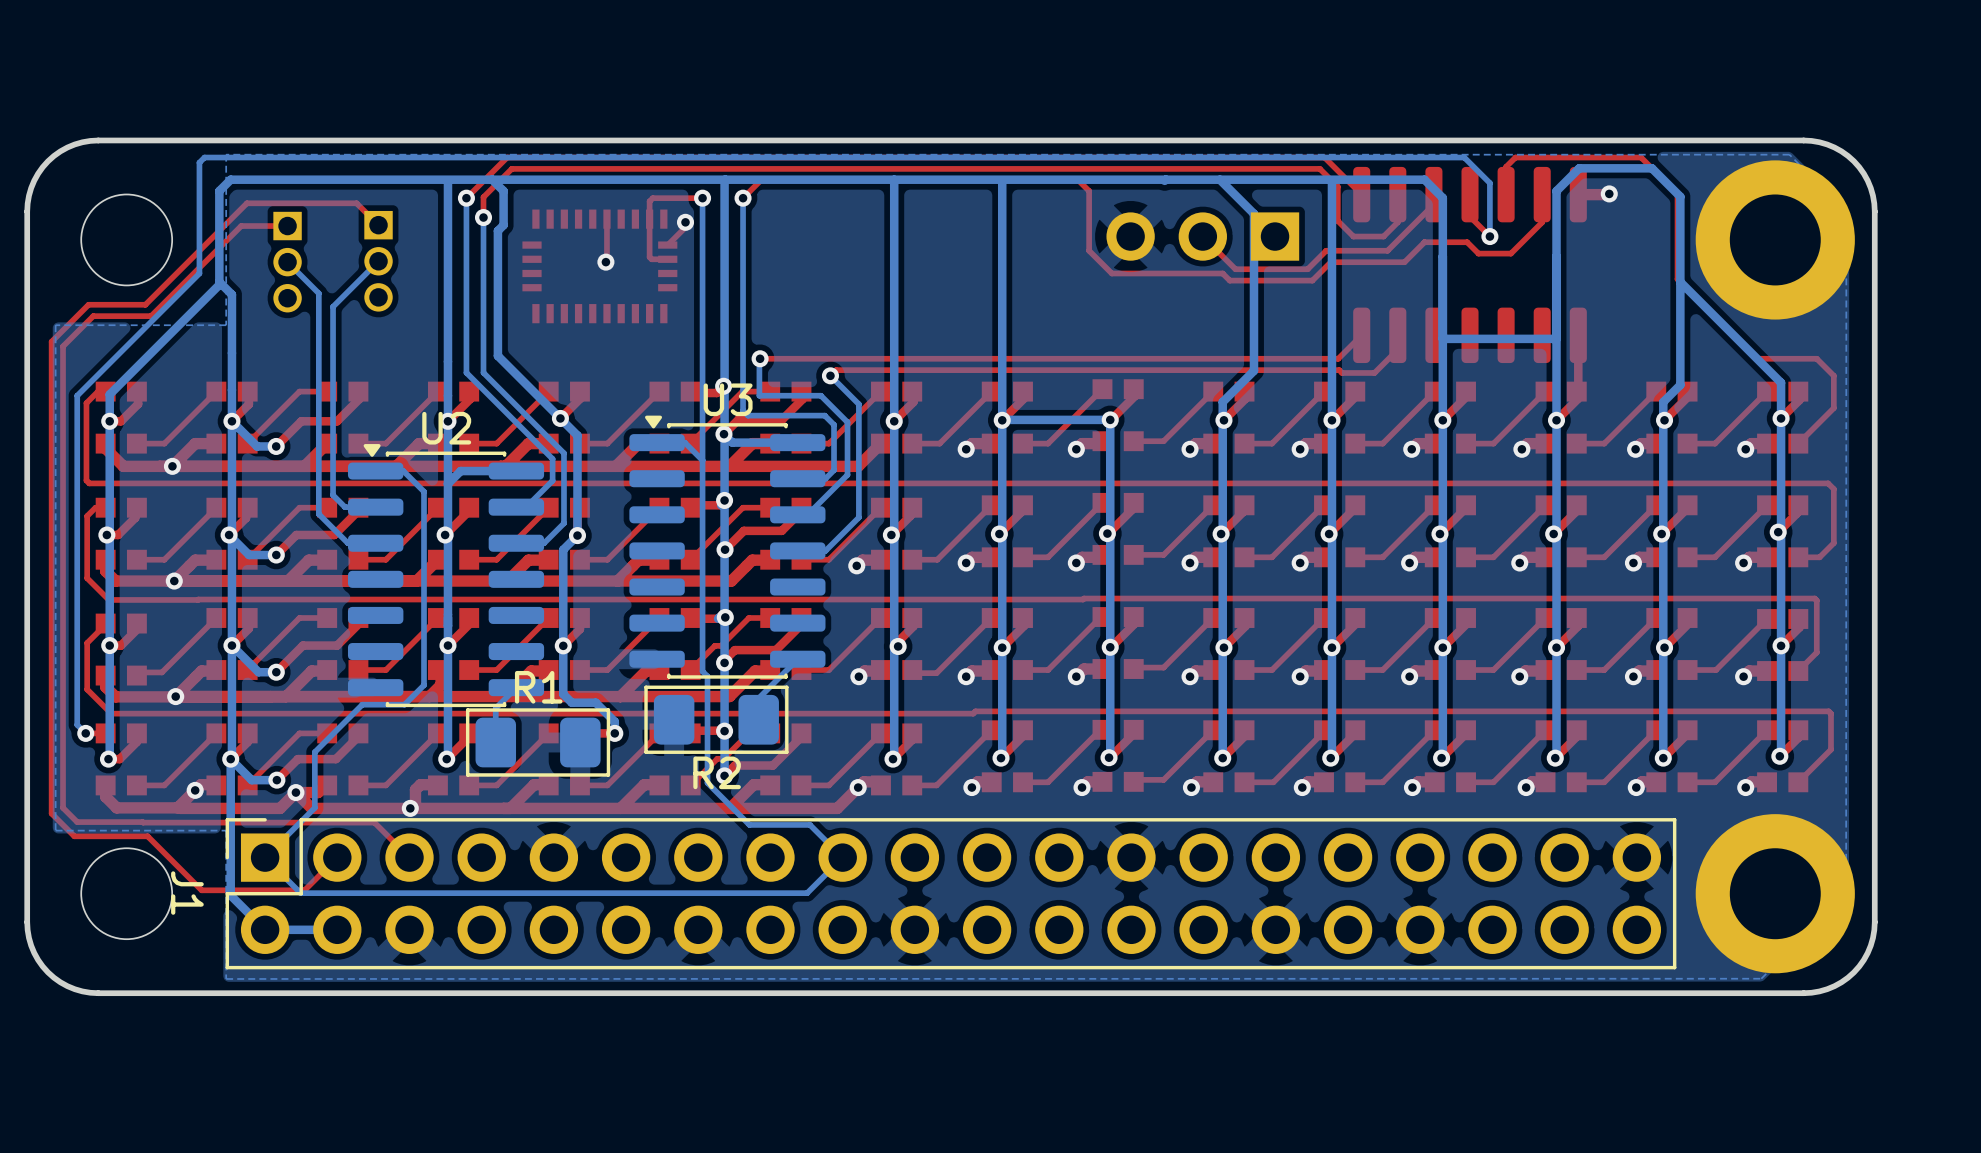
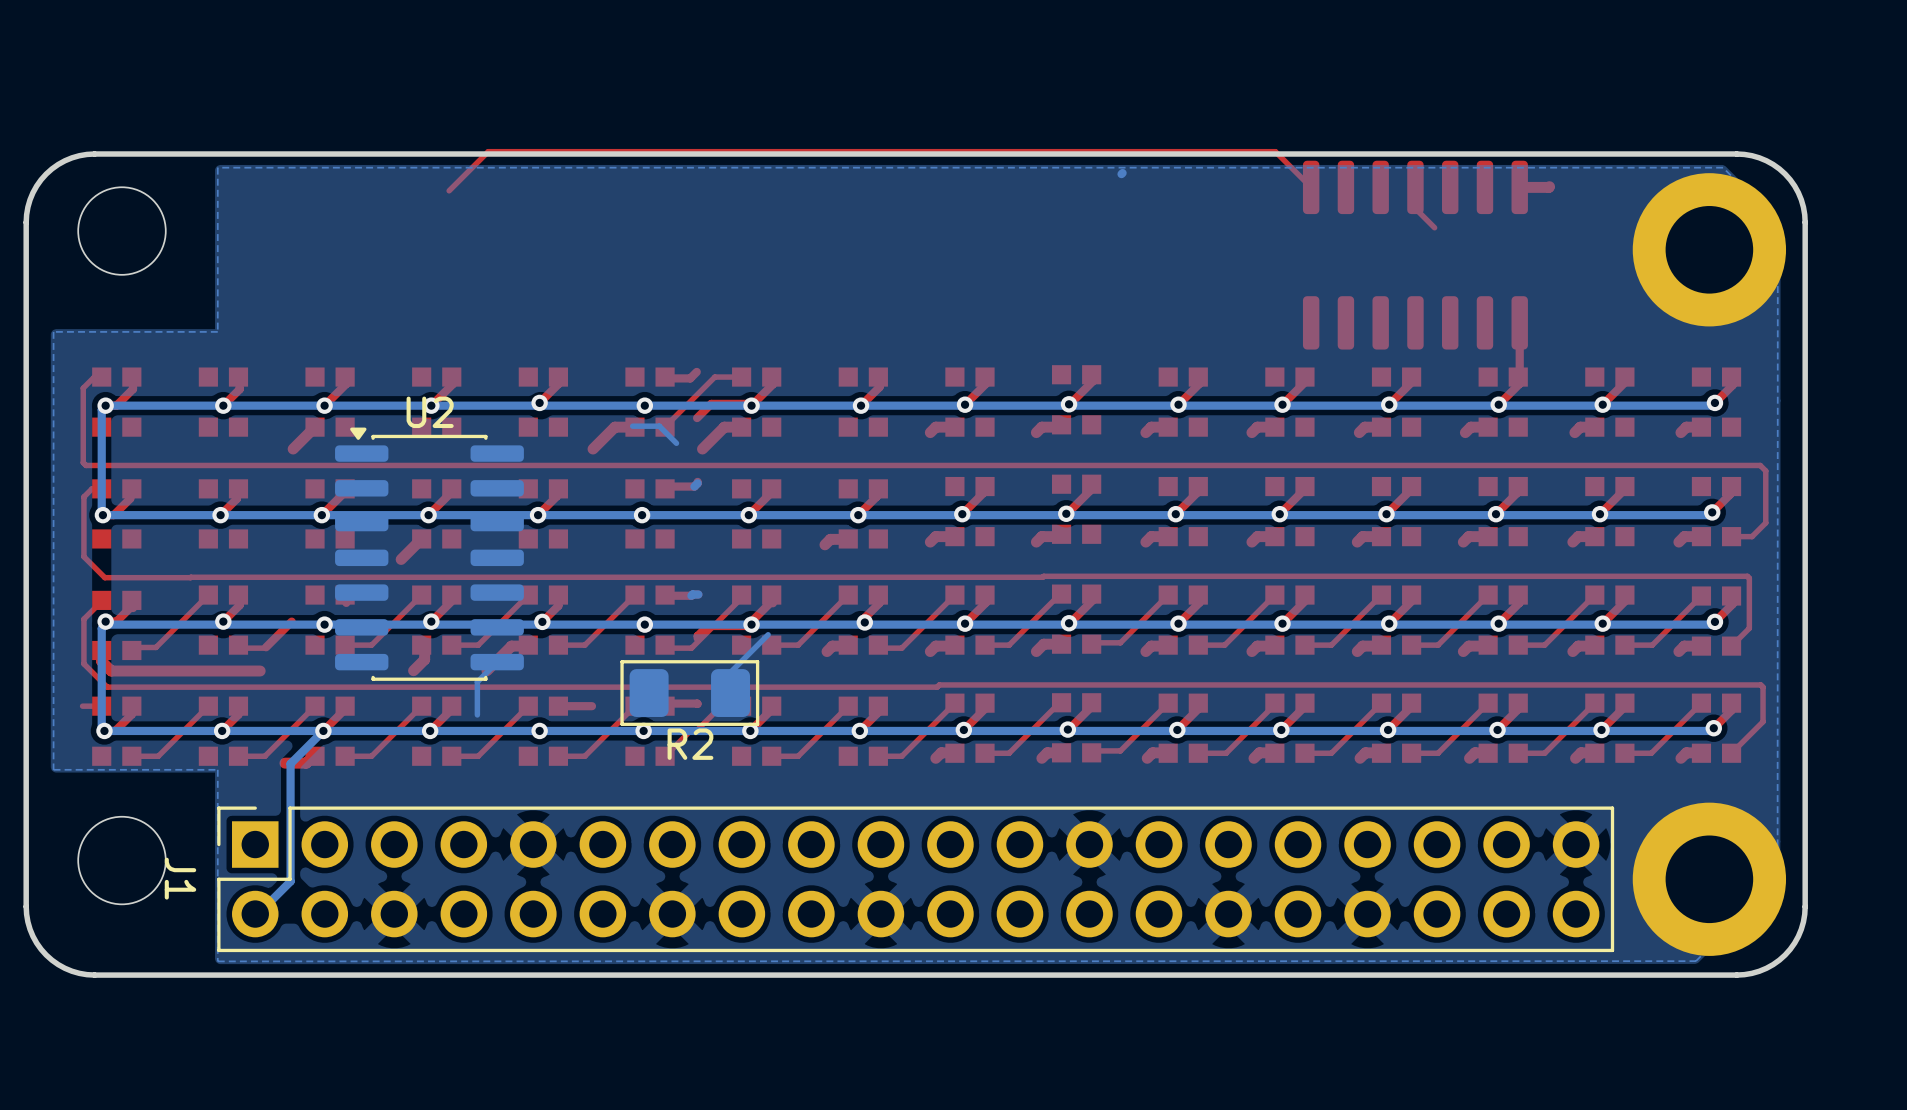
bottom zone outline: (226, 174) (226, 154) (1789, 154) (1846, 211) (1846, 893) (1761, 978) (226, 978) -> (217, 167) (1723, 167) (1777, 222) (1777, 879) (1695, 961) (217, 961) (217, 942)
bottom track: (492, 179) (503, 191) (503, 225) (497, 230) (497, 355) (577, 435) (577, 535) (563, 549) (563, 694) (571, 702) (595, 702) (614, 721) (614, 733) -> none
bottom track: (725, 179) (724, 775) -> none
bottom track: (894, 179) (893, 759) -> none
bottom track: (1219, 179) (1253, 213) (1253, 370) (1222, 402) (1222, 758) -> none
bottom track: (1002, 180) (1001, 758) -> none
bottom track: (447, 182) (446, 759) -> none
bottom track: (1331, 182) (1330, 758) -> none
via: (1609, 193) -> none
top track: (1397, 194) (1397, 222) (1383, 236) (1353, 236) (1337, 220) (1337, 186) (1319, 168) (511, 168) (483, 197) (483, 217) -> none
top track: (1433, 194) (1433, 204) (1387, 250) (1326, 250) (1307, 269) (1235, 269) (1202, 236) -> none
top track: (1506, 194) (1506, 166) (1515, 157) (1641, 157) (1677, 193) (1677, 279) (1757, 358) (1816, 358) (1833, 375) (1833, 408) (1798, 443) -> none
top track: (1542, 194) (1542, 222) (1510, 253) (1478, 253) (1467, 242) (1424, 242) -> none
bottom track: (466, 198) (466, 372) (552, 458) (552, 480) (526, 507) (516, 507) -> none
via: (466, 198) -> none
top track: (702, 198) (652, 198) (649, 201) (649, 257) (651, 259) (667, 259) -> none
bottom track: (702, 198) (702, 671) (707, 676) (707, 782) (749, 824) (810, 824) (842, 857) (807, 893) (300, 893) (265, 857) (314, 807) (314, 752) (362, 704) (404, 704) (424, 685) (424, 491) (403, 471) (375, 471) -> none
via: (702, 198) -> none
top track: (743, 198) (760, 180) (1078, 180) (1089, 191) (1089, 250) (1111, 273) (1222, 273) (1229, 280) (1312, 280) (1330, 262) (1404, 262) (1424, 242) -> none
bottom track: (743, 198) (743, 410) (748, 415) (824, 415) (834, 424) (834, 470) (825, 478) (797, 478) -> none
via: (743, 198) -> none
bottom track: (483, 217) (483, 372) (563, 453) (563, 523) (544, 543) (516, 543) -> none
via: (483, 217) -> none
top track: (606, 219) (605, 262) -> none
top track: (685, 222) (685, 227) (667, 245) -> none
via: (685, 222) -> none
top track: (378, 225) (356, 203) (246, 203) (145, 304) (88, 304) (51, 341) (51, 813) (74, 836) (147, 836) (201, 890) (304, 890) (337, 857) -> none
top track: (287, 226) (241, 226) (151, 316) (93, 316) (63, 346) (63, 807) (77, 822) (374, 822) (409, 857) -> none
board edge: (1874, 231) (1872, 195) (1867, 180) (1859, 167) (1848, 155) (1834, 147) (1819, 142) (1803, 140) (98, 140) (82, 142) (67, 147) (53, 155) (42, 167) (34, 180) (28, 195) (27, 231) -> (1805, 222) (1801, 199) (1794, 186) (1785, 174) (1773, 164) (1759, 157) (1736, 154) (94, 154) (72, 157) (58, 164) (46, 174) (32, 192) (27, 207) (26, 222)
part: (1202, 236) -> none
bottom track: (1489, 236) (1489, 183) (1464, 157) (204, 157) (199, 162) (199, 273) (77, 395) (77, 724) (85, 733) -> none
via: (1489, 236) -> none
part position: (1775, 239) -> (1709, 249)
bottom track: (378, 261) (333, 306) (333, 495) (344, 507) (375, 507) -> none
part: (378, 261) -> none
bottom track: (287, 262) (318, 293) (318, 514) (347, 543) (375, 543) -> none
part: (287, 262) -> none
via: (605, 262) -> none
part: (599, 266) -> none
bottom track: (219, 282) (231, 294) (231, 757) -> none
bottom track: (1680, 282) (1781, 382) (1779, 756) -> (1714, 621) (1712, 624) (105, 624) (101, 628) (101, 728) (104, 730) (1711, 730) (1713, 728)
bottom zone outline: (226, 325) (55, 325) (55, 344) -> (217, 313) (217, 331) (53, 331)
top track: (1361, 335) (1338, 358) (760, 358) -> none
top track: (1397, 335) (1397, 349) (1374, 372) (1342, 372) (1339, 370) (836, 370) (830, 375) -> none
bottom track: (1556, 338) (1442, 338) -> none
bottom track: (760, 358) (759, 395) (820, 395) (847, 422) (847, 474) (807, 514) (797, 514) -> none
via: (760, 358) -> none
bottom track: (830, 375) (858, 404) (858, 517) (825, 550) (797, 550) -> none
via: (830, 375) -> none
via: (723, 386) -> none
top track: (1102, 389) (1048, 443) (1022, 443) -> none
top track: (216, 391) (164, 443) (136, 443) -> none
top track: (327, 391) (299, 391) (247, 443) -> none
top track: (437, 391) (385, 443) (358, 443) -> none
top track: (548, 391) (496, 443) (469, 443) -> none
top track: (659, 391) (607, 443) (579, 443) -> none
top track: (880, 391) (828, 443) (801, 443) -> none
top track: (991, 391) (939, 443) (912, 443) -> none
top track: (1213, 391) (1163, 441) (1133, 441) -> none
top track: (1324, 391) (1271, 443) (1244, 443) -> none
top track: (1434, 391) (1382, 443) (1355, 443) -> none
top track: (1545, 391) (1493, 443) (1466, 443) -> none
top track: (1656, 391) (1604, 443) (1576, 443) -> none
top track: (1767, 391) (1715, 443) (1687, 443) -> none
top track: (359, 398) (337, 421) (301, 421) (276, 446) -> (346, 383) (324, 405)
bottom track: none -> (1714, 402) (1712, 405) (105, 405) (101, 409) (102, 515) (1709, 515) (1712, 512)
bottom track: (1002, 420) (1110, 419) (1109, 757) -> none
bottom track: (231, 421) (257, 446) (276, 446) -> none
via: none -> (324, 405)
via: none -> (644, 405)
via: none -> (751, 405)
bottom track: (723, 434) (732, 442) (797, 442) -> none
via: (723, 434) -> none
top track: (210, 443) (195, 443) (172, 466) -> none
top track: (434, 443) (419, 443) (396, 466) -> none
top track: (544, 443) (528, 443) (505, 466) -> none
top track: (880, 443) (858, 466) (123, 466) (105, 448) (105, 443) -> none
via: (276, 446) -> none
via: (966, 449) -> none
via: (1076, 449) -> none
via: (1190, 449) -> none
via: (1300, 449) -> none
via: (1411, 449) -> none
via: (1521, 449) -> none
via: (1635, 449) -> none
via: (1745, 449) -> none
via: (172, 466) -> none
bottom track: (516, 471) (460, 471) (447, 483) -> none
via: (724, 500) -> none
top track: (1102, 502) (1048, 557) (1022, 557) -> none
top track: (991, 505) (937, 559) (912, 559) -> none
top track: (1213, 505) (1163, 554) (1133, 554) -> none
top track: (1324, 505) (1271, 557) (1244, 557) -> none
top track: (1434, 505) (1382, 557) (1355, 557) -> none
top track: (1545, 505) (1493, 557) (1466, 557) -> none
top track: (1656, 505) (1604, 557) (1576, 557) -> none
top track: (1767, 505) (1715, 557) (1687, 557) -> none
top track: (216, 507) (164, 559) (136, 559) -> none
top track: (327, 507) (299, 507) (247, 559) -> none
top track: (437, 507) (385, 559) (358, 559) -> none
top track: (548, 507) (496, 559) (469, 559) -> none
top track: (659, 507) (607, 559) (579, 559) -> (741, 598) (691, 648) (665, 648)
top track: (770, 507) (742, 507) (690, 559) -> none
top track: (880, 507) (828, 559) (801, 559) -> none
top track: none -> (556, 490) (556, 496) (538, 515)
top track: (356, 512) (334, 535) (296, 535) (276, 555) -> (343, 493) (321, 515)
top track: (799, 512) (781, 530) (743, 530) (725, 549) -> (770, 493) (748, 515)
bottom track: (229, 535) (249, 555) (276, 555) -> none
via: none -> (321, 515)
via position: (577, 535) -> (538, 515)
via: none -> (642, 515)
via: none -> (748, 515)
U3: (727, 547) -> none
via: (725, 549) -> none
via: (276, 555) -> none
top track: (105, 559) (105, 571) (115, 581) (731, 581) (752, 560) (767, 560) -> none
top track: (210, 560) (195, 560) (174, 581) -> none
top track: (324, 560) (308, 560) (287, 581) -> none
top track: (544, 560) (528, 560) (507, 581) -> none
top track: (654, 560) (638, 560) (617, 581) -> none
via: (966, 563) -> none
via: (1076, 563) -> none
via: (1190, 563) -> none
via: (1300, 563) -> none
via: (1409, 563) -> none
via: (1519, 563) -> none
via: (1633, 563) -> none
via: (1743, 563) -> none
via: (856, 565) -> none
via: (174, 581) -> none
via: (725, 617) -> none
top track: (327, 618) (299, 618) (247, 669) -> none
top track: (770, 618) (748, 618) (721, 645) (714, 645) (690, 670) -> none
top track: (359, 619) (359, 622) (337, 645) (302, 645) -> none
bottom track: (231, 645) (258, 672) (276, 672) -> none
via: none -> (324, 624)
via: none -> (644, 624)
via: none -> (751, 624)
via: (724, 662) -> none
top track: (217, 671) (201, 671) (175, 696) -> none
top track: (327, 671) (311, 671) (286, 696) -> none
top track: (660, 671) (646, 671) (620, 696) -> none
top track: (770, 671) (755, 671) (729, 696) (175, 696) -> none
via: (276, 672) -> none
top track: none -> (264, 648) (238, 648)
via: (858, 676) -> none
via: (966, 676) -> none
via: (1076, 676) -> none
via: (1190, 676) -> none
via: (1300, 676) -> none
via: (1409, 676) -> none
via: (1519, 676) -> none
via: (1633, 676) -> none
via: (1743, 676) -> none
via: (175, 696) -> none
via: (724, 731) -> none
via: (85, 733) -> none
top track: (327, 733) (299, 733) (247, 785) -> (315, 706) (264, 756) (238, 756)
via: (614, 733) -> none
R1: (538, 742) -> none
bottom track: (1441, 758) (1442, 197) (1424, 179) (230, 179) (219, 191) (219, 284) (109, 394) (109, 760) -> none
bottom track: (1663, 758) (1663, 402) (1680, 385) (1680, 196) (1651, 168) (1579, 168) (1556, 191) (1555, 758) -> none
top track: (335, 759) (297, 759) (276, 780) -> none
bottom track: none -> (323, 730) (290, 763) (290, 881) (258, 914)
via: none -> (323, 730)
via: none -> (539, 730)
via: none -> (643, 730)
top track: (779, 759) (772, 765) (734, 765) (724, 775) -> none
via: none -> (750, 730)
via: (724, 775) -> none
bottom track: (276, 779) (251, 780) (230, 759) (230, 895) (265, 929) (337, 929) -> none
via: (276, 780) -> none
top track: (879, 781) (863, 781) (837, 808) (311, 808) (295, 792) (280, 808) (180, 808) (178, 806) -> none
top track: (216, 784) (200, 784) (177, 807) (116, 807) (105, 796) (105, 785) -> none
top track: (436, 784) (420, 784) (415, 789) (415, 803) (410, 808) -> none
top track: (549, 784) (534, 784) (510, 808) -> none
top track: (659, 784) (644, 784) (620, 808) -> none
top track: (769, 784) (753, 784) (730, 808) -> none
via: (858, 787) -> none
via: (971, 787) -> none
via: (1082, 787) -> none
via: (1191, 787) -> none
via: (1302, 787) -> none
via: (1412, 787) -> none
via: (1526, 787) -> none
via: (1636, 787) -> none
via: (1745, 787) -> none
via: (195, 790) -> none
via: (295, 792) -> none
bottom zone outline: (55, 799) (55, 830) (226, 830) -> (53, 769) (217, 769) (217, 799)
via: (410, 808) -> none
J1 position: (950, 893) -> (915, 879)
part position: (1775, 893) -> (1709, 879)
board edge: (1874, 922) (1870, 945) (1863, 959) (1853, 972) (1841, 982) (1827, 989) (1803, 993) (98, 993) (74, 989) (60, 982) (48, 972) (38, 959) (31, 945) (27, 922) -> (1805, 887) (1803, 921) (1798, 936) (1790, 949) (1779, 960) (1766, 968) (1751, 973) (1736, 975) (94, 975) (79, 973) (64, 968) (51, 960) (41, 949) (32, 936) (27, 921) (26, 887)

